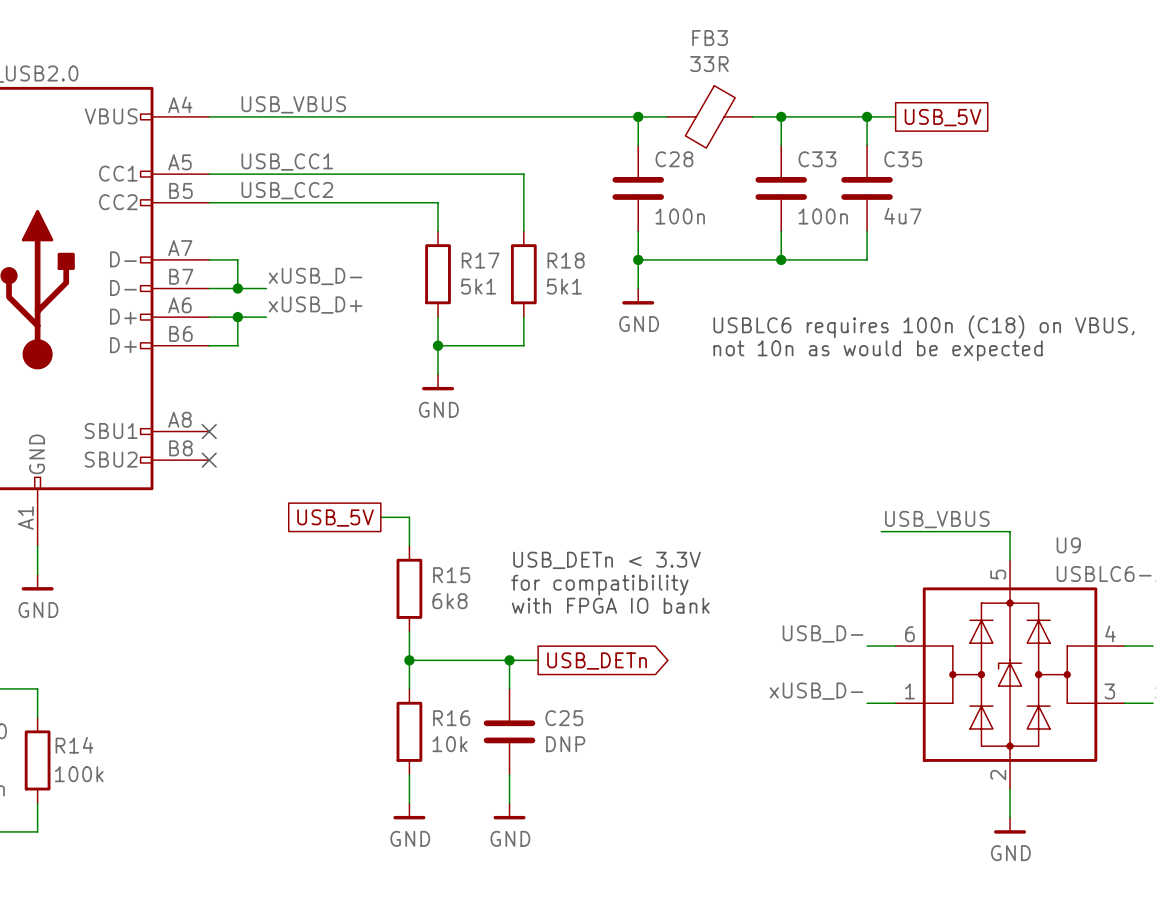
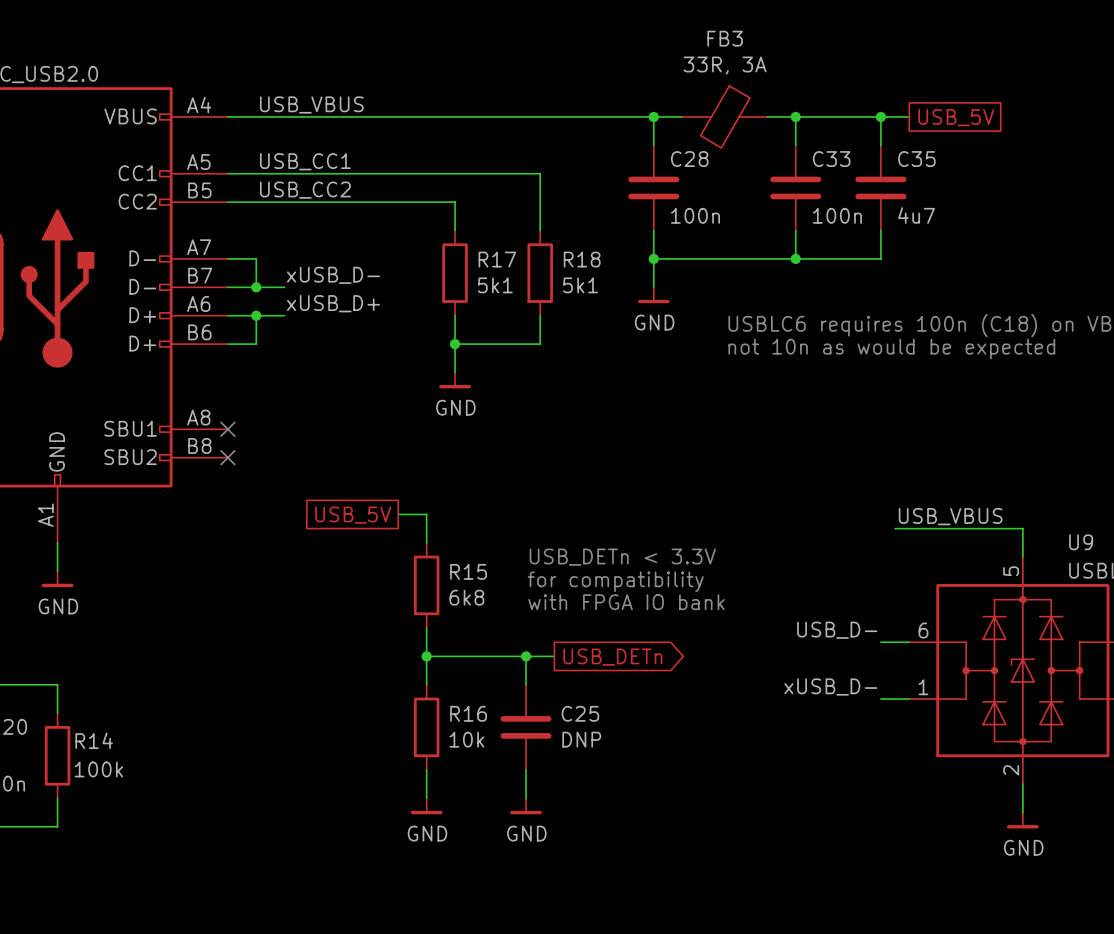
FB3 value: 33R (709, 64) -> 33R, 3A (725, 65)

